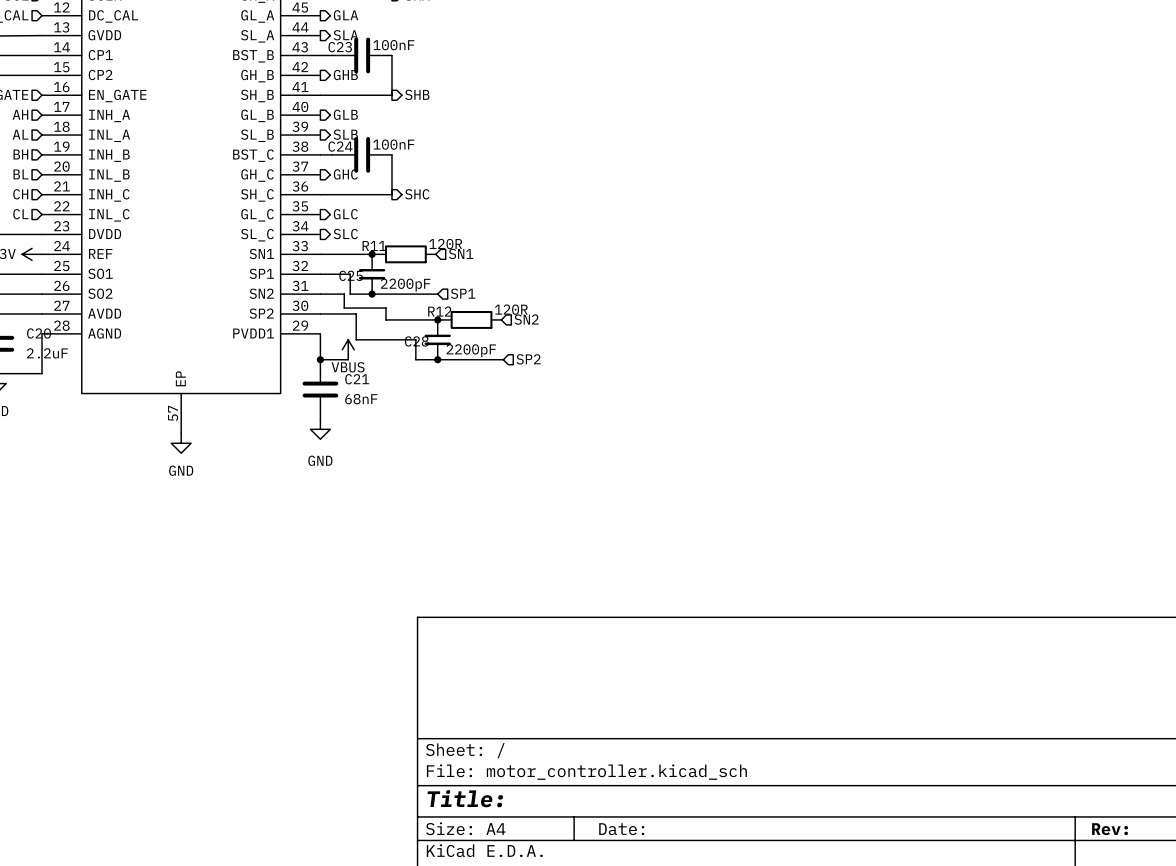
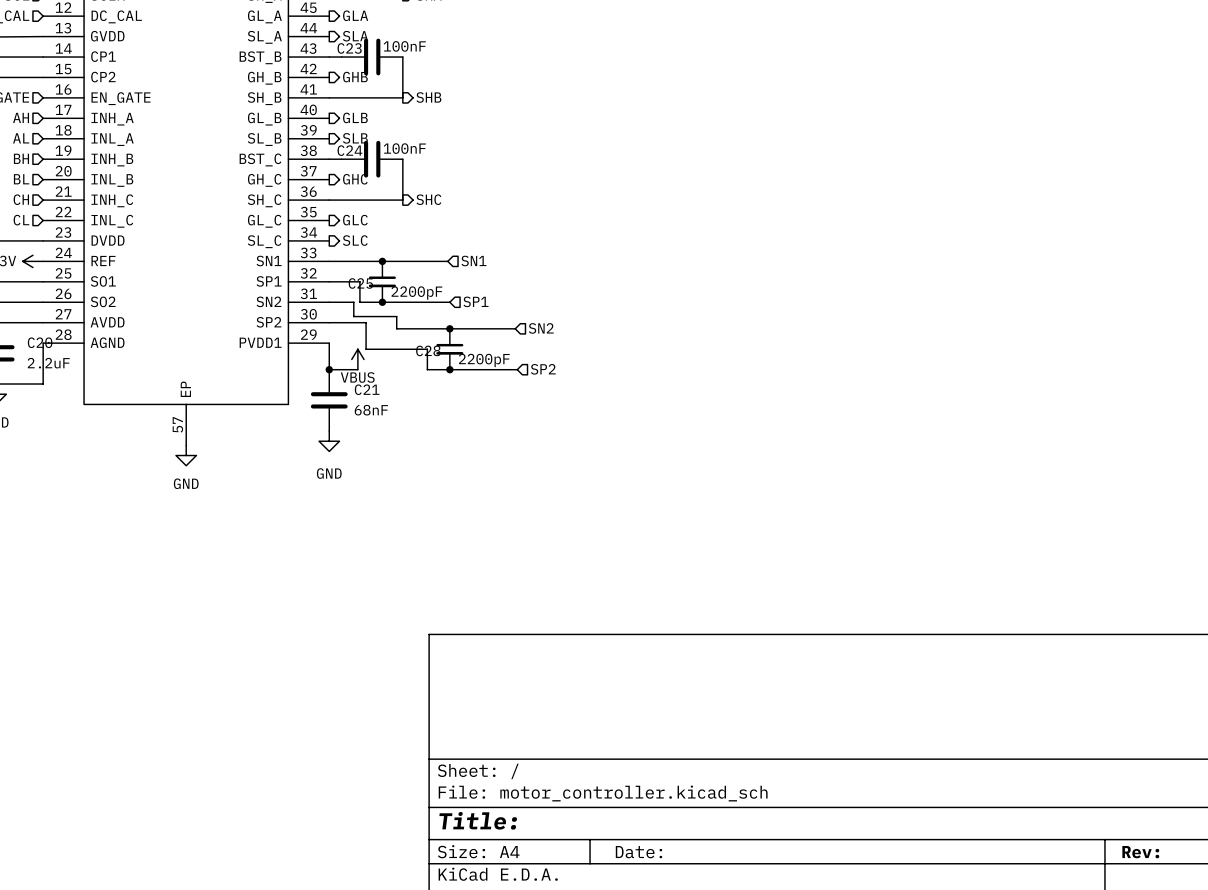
wire: none -> (386, 261) (447, 261)
R11: 120R (405, 254) -> none
wire: none -> (453, 328) (515, 328)
R12: 120R (471, 319) -> none

